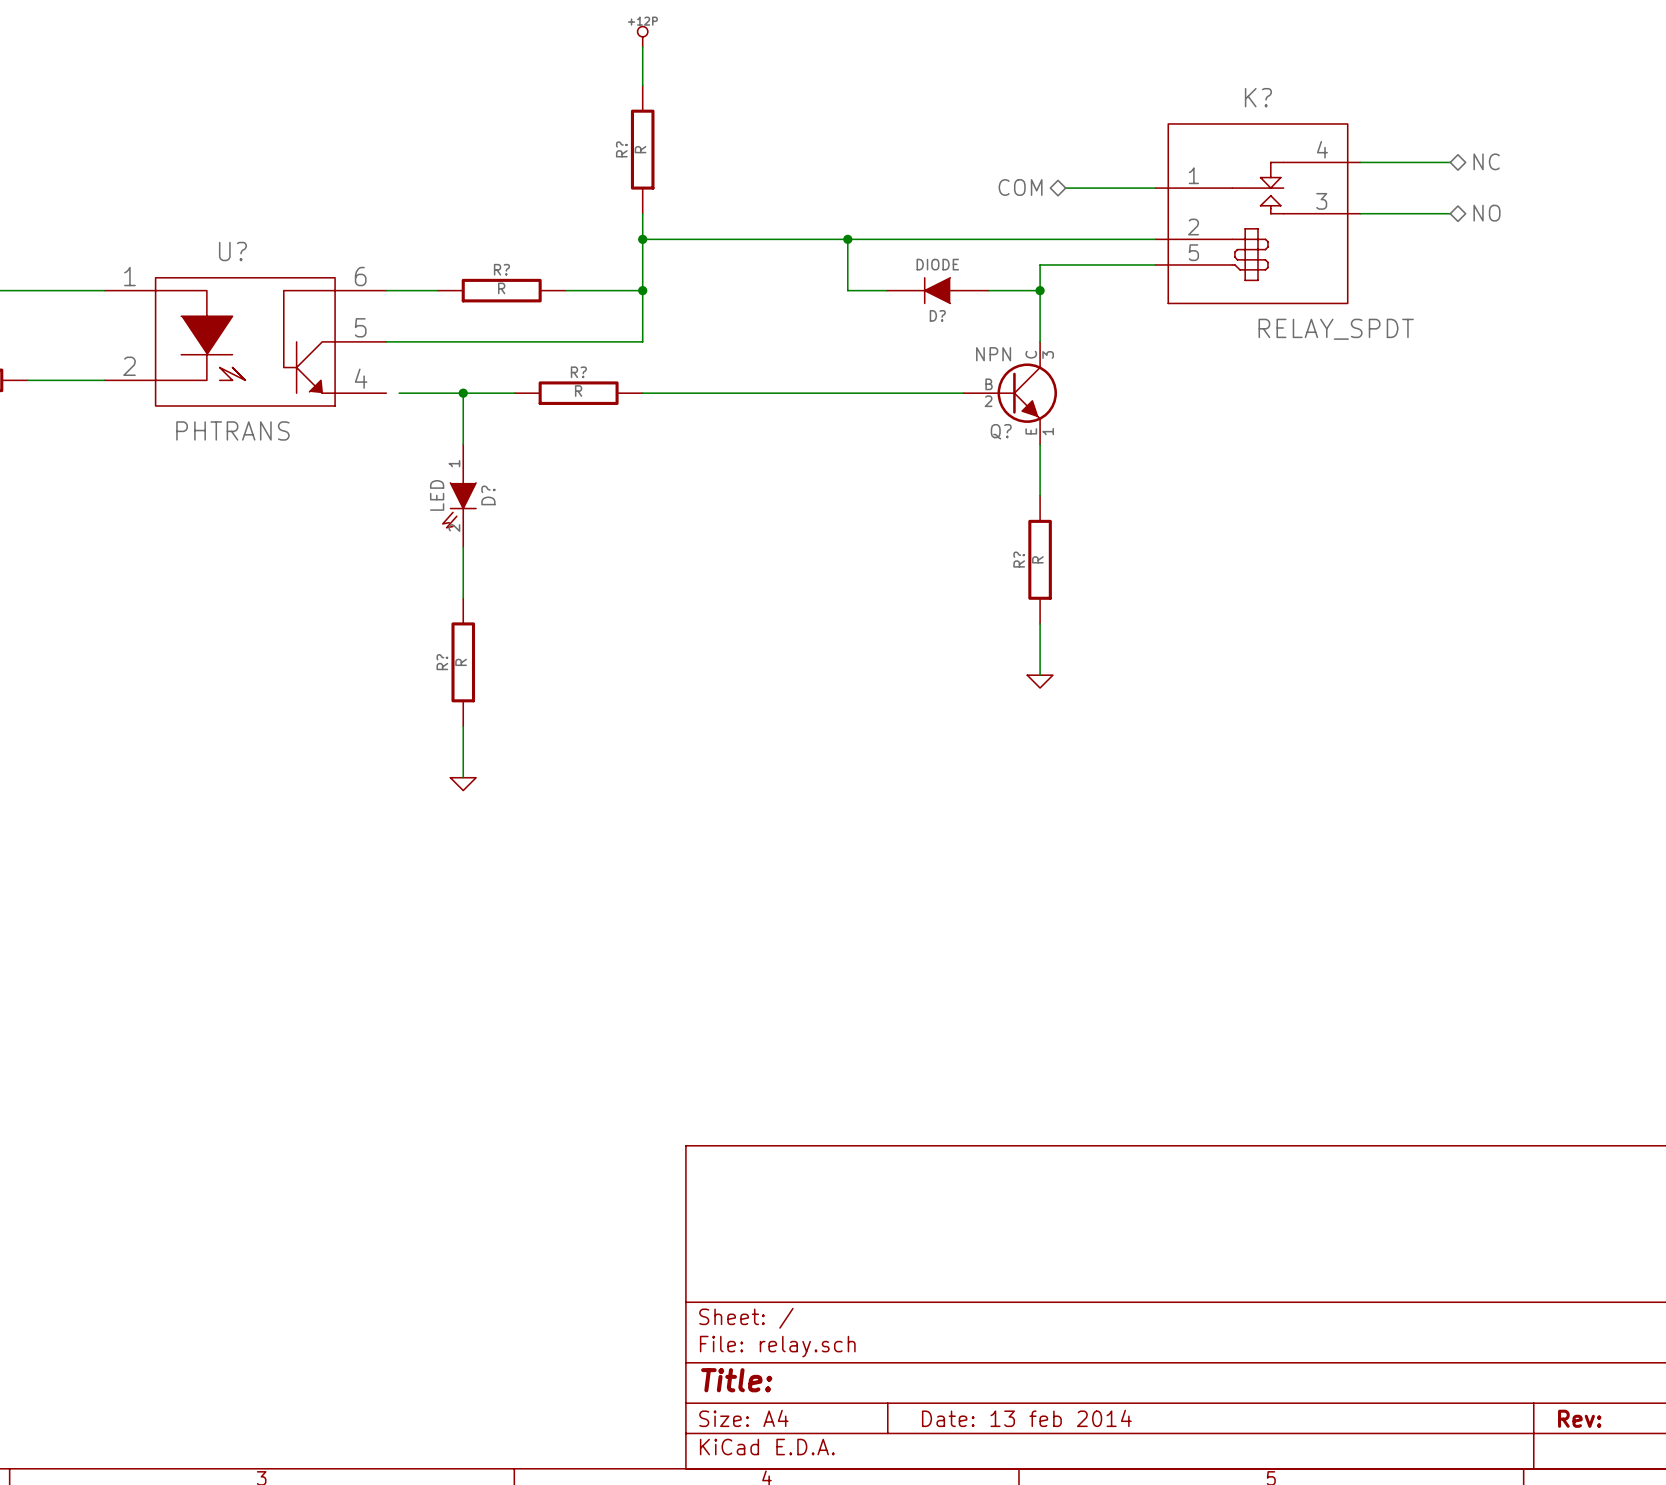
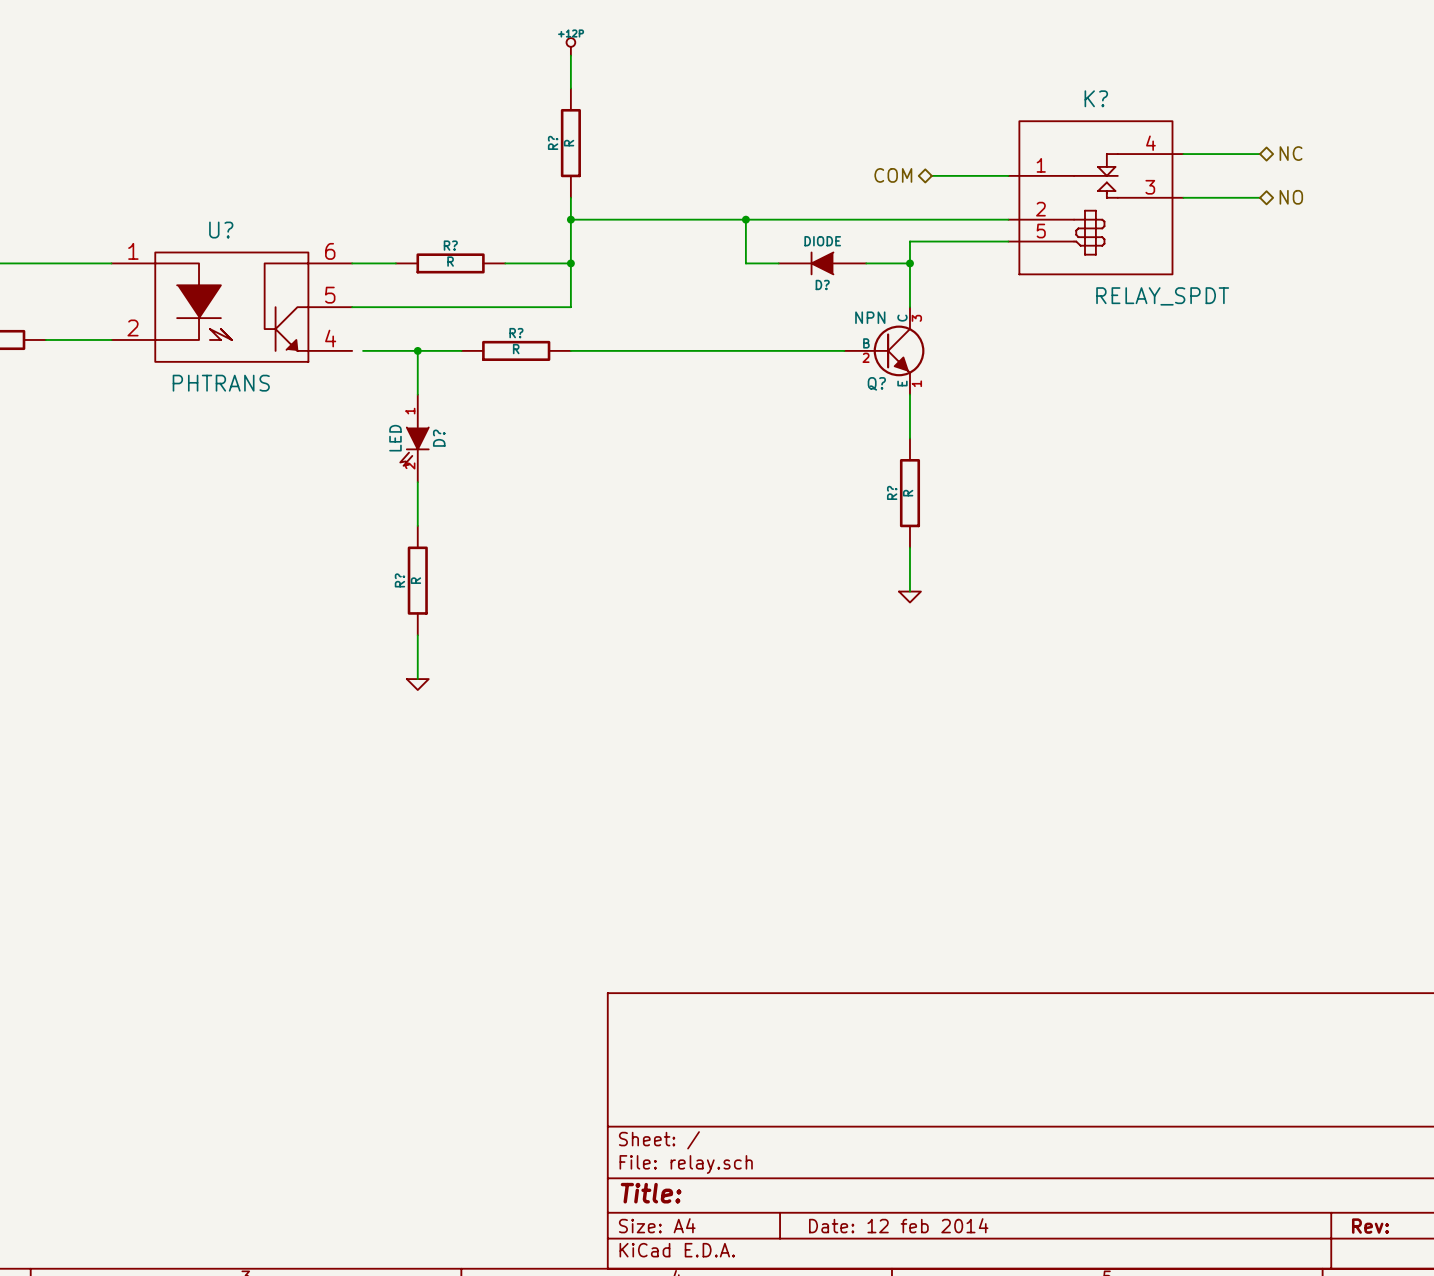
title block: Date: 13 feb 2014 (1026, 1418) -> Date: 12 feb 2014 (898, 1225)

